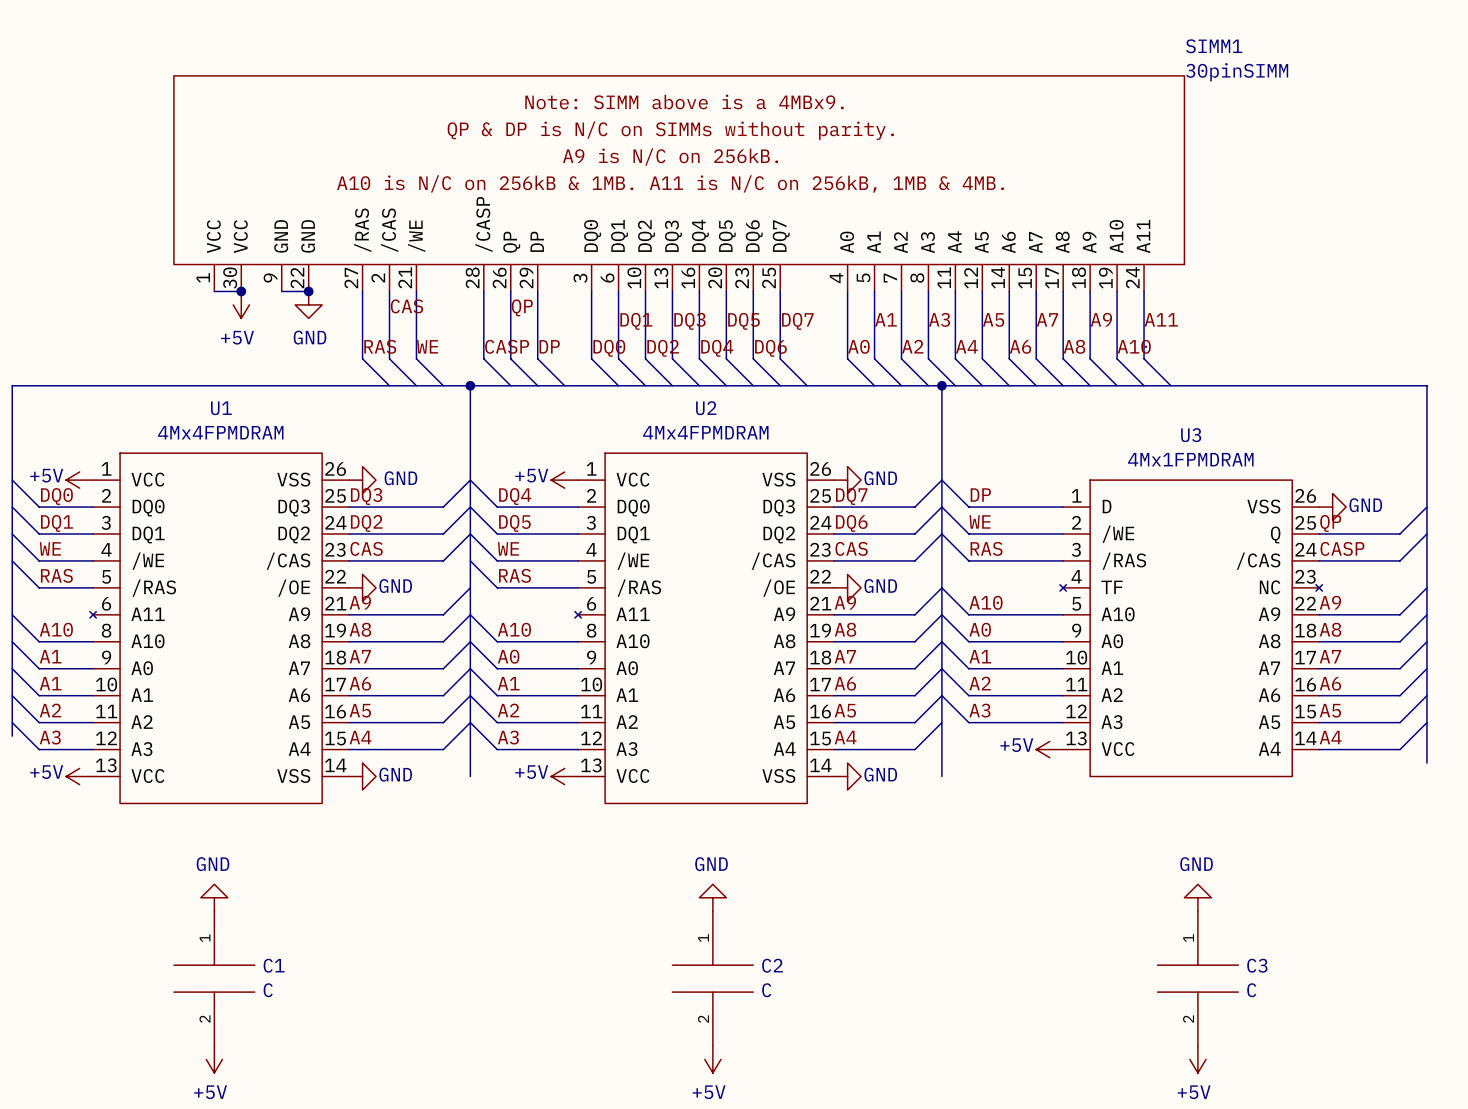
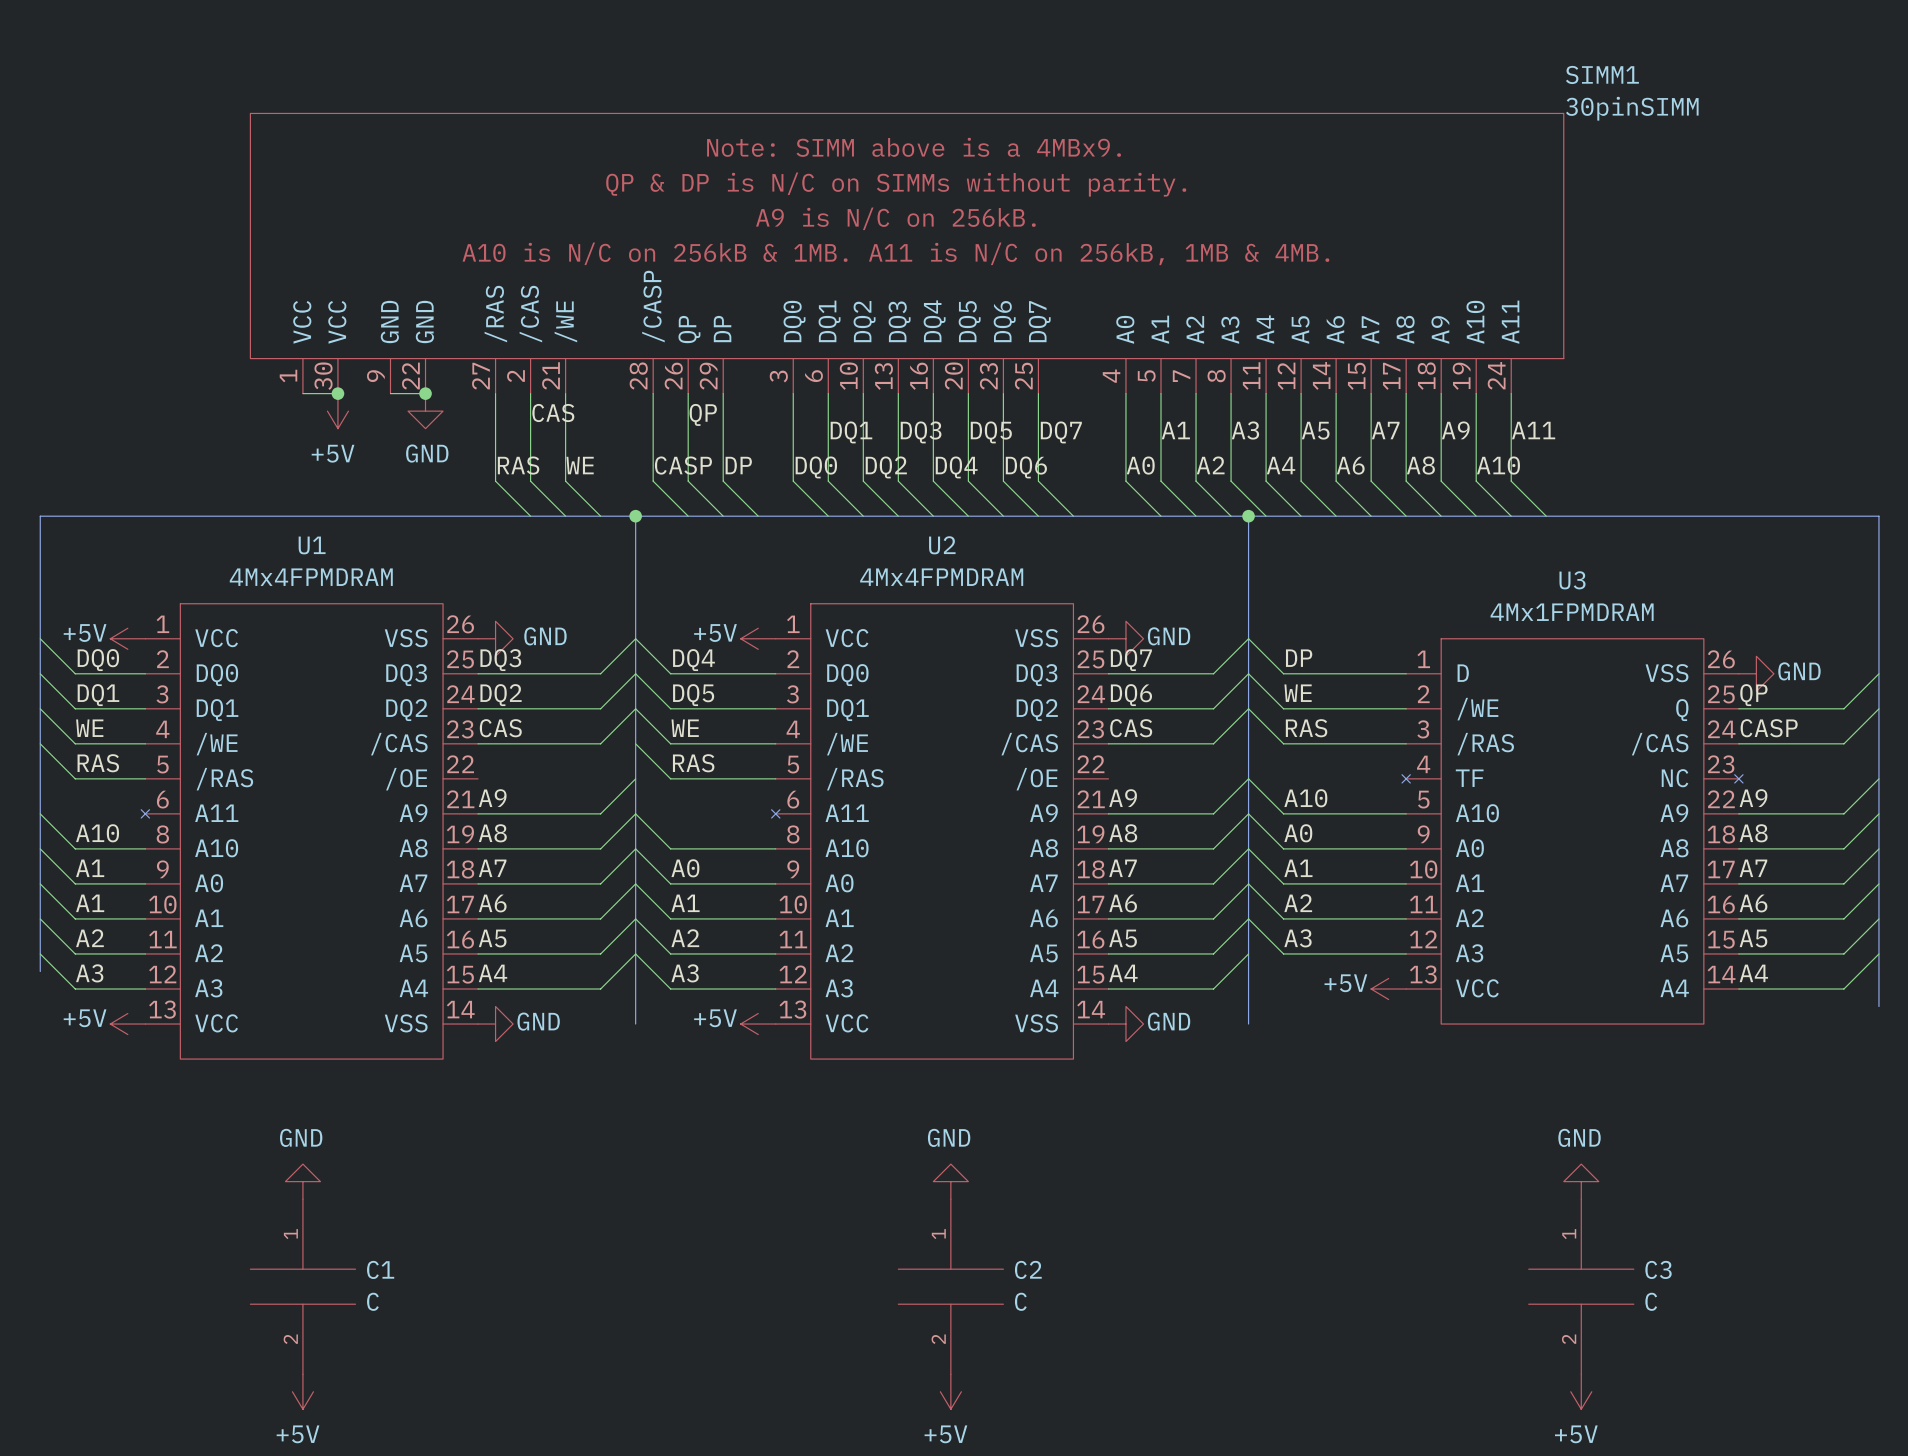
power symbol: GND (362, 587) -> none
power symbol: GND (847, 587) -> none
label: A10 (514, 629) -> none

